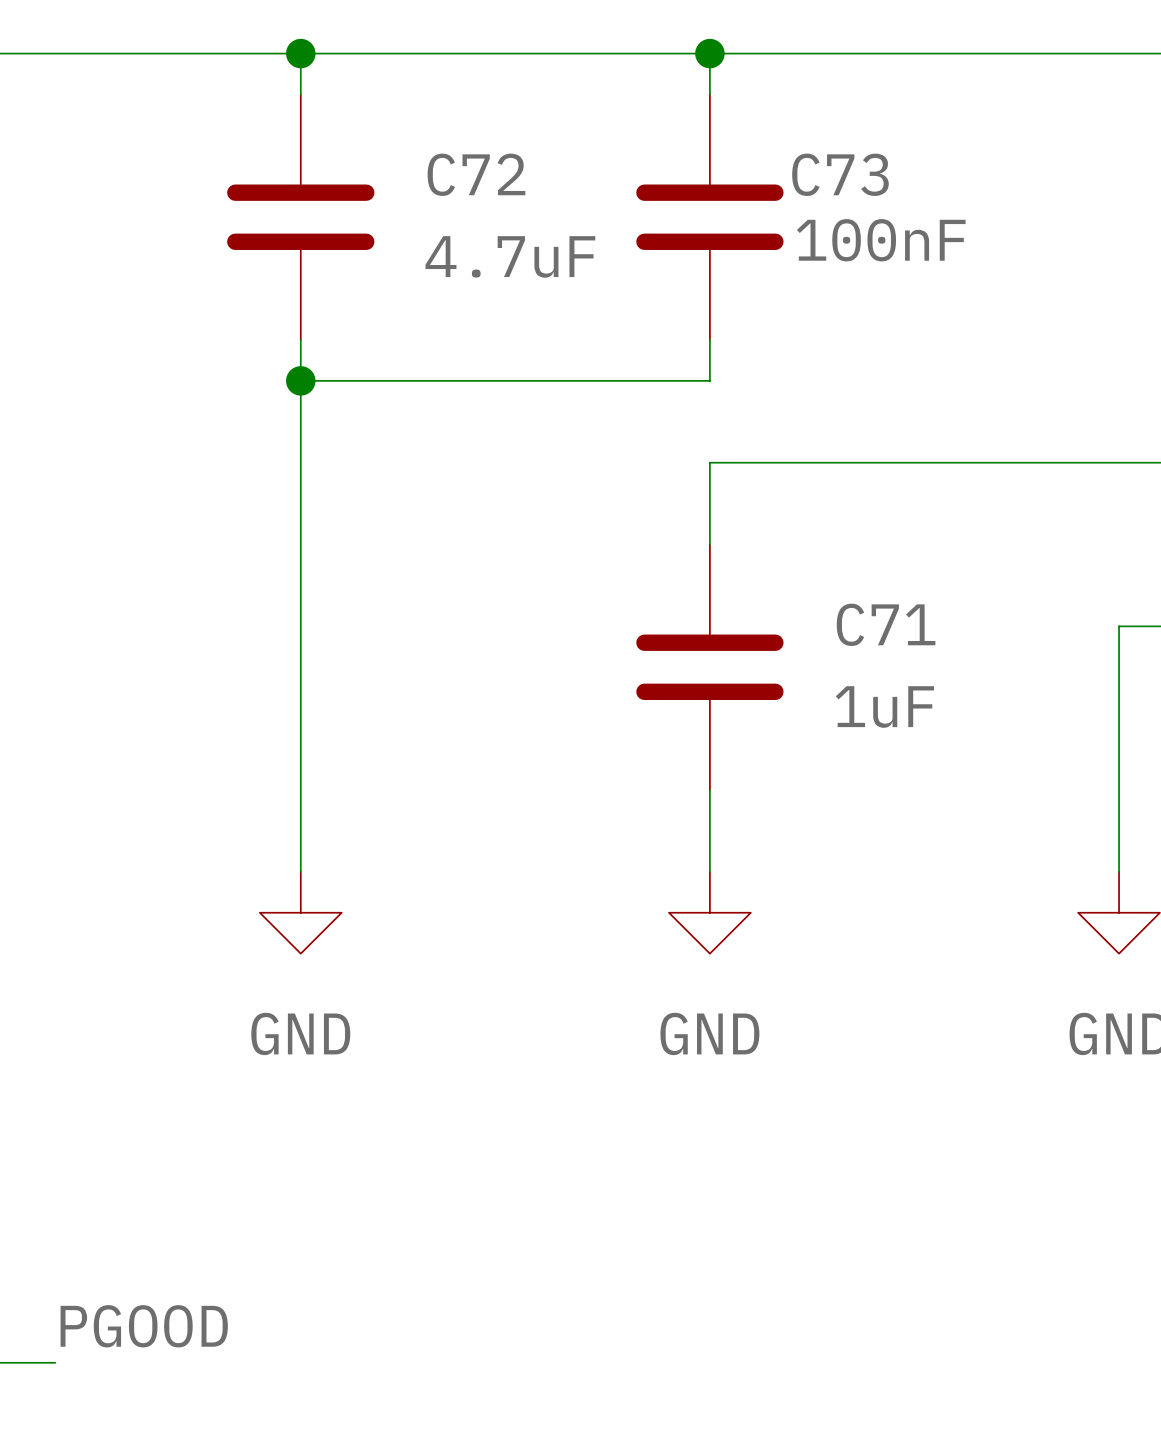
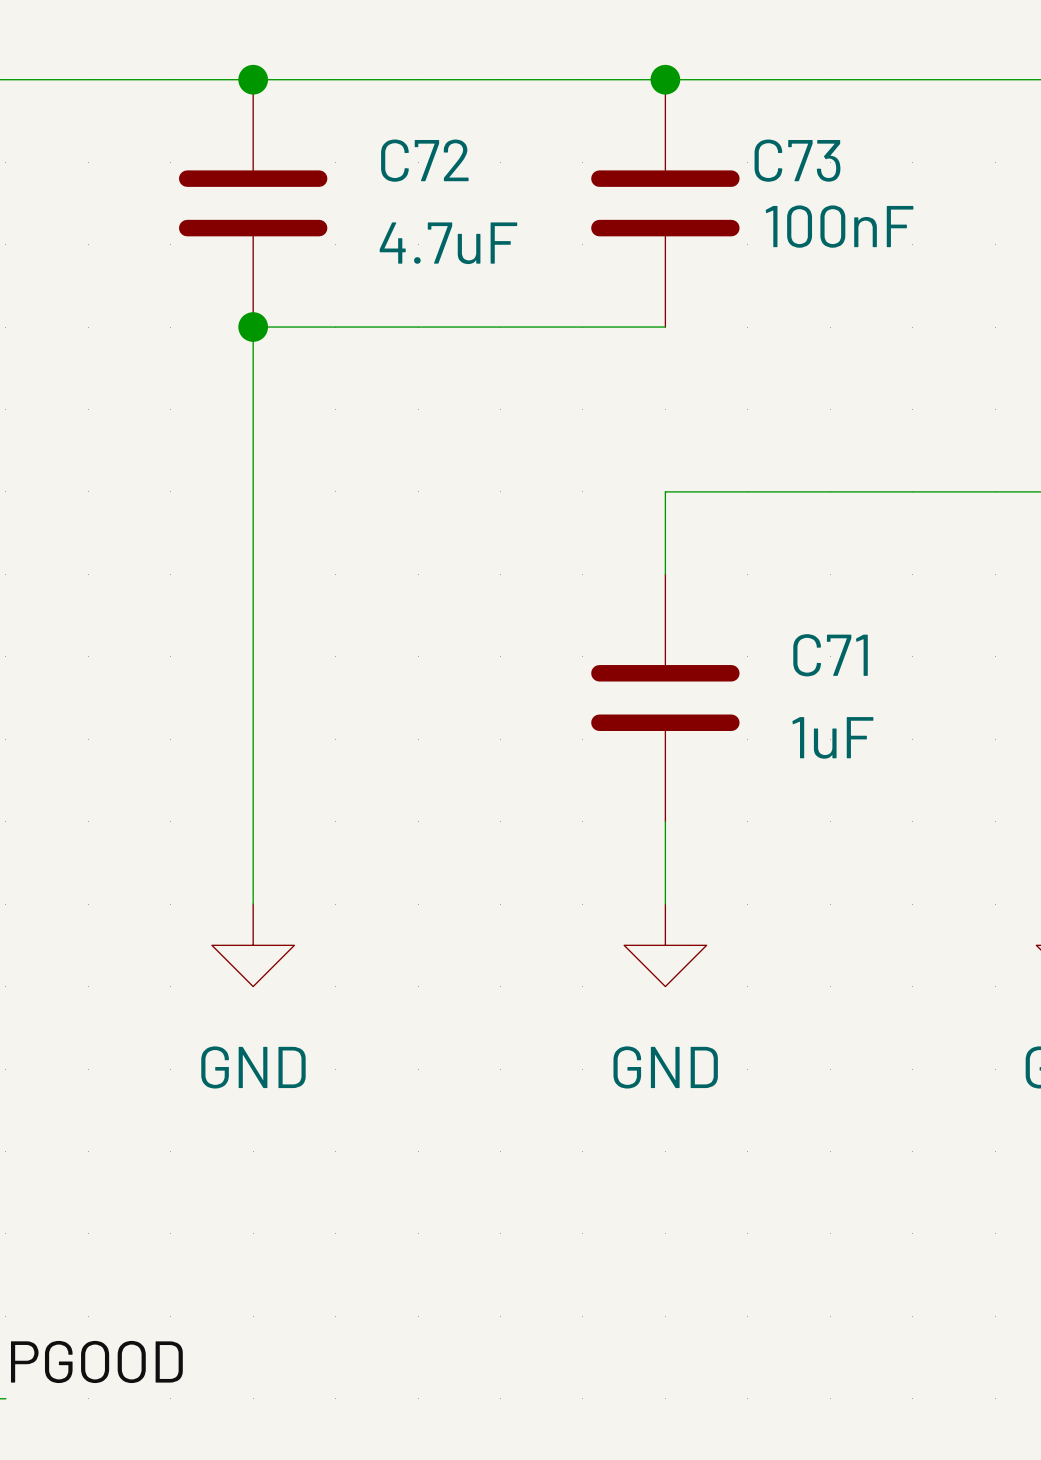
C72 position: (300, 217) -> (253, 203)
C73 position: (709, 217) -> (665, 203)
wire: none -> (665, 327) (253, 327) (253, 368)
wire: (709, 339) (709, 380) (300, 380) -> none
junction position: (300, 380) -> (253, 327)

